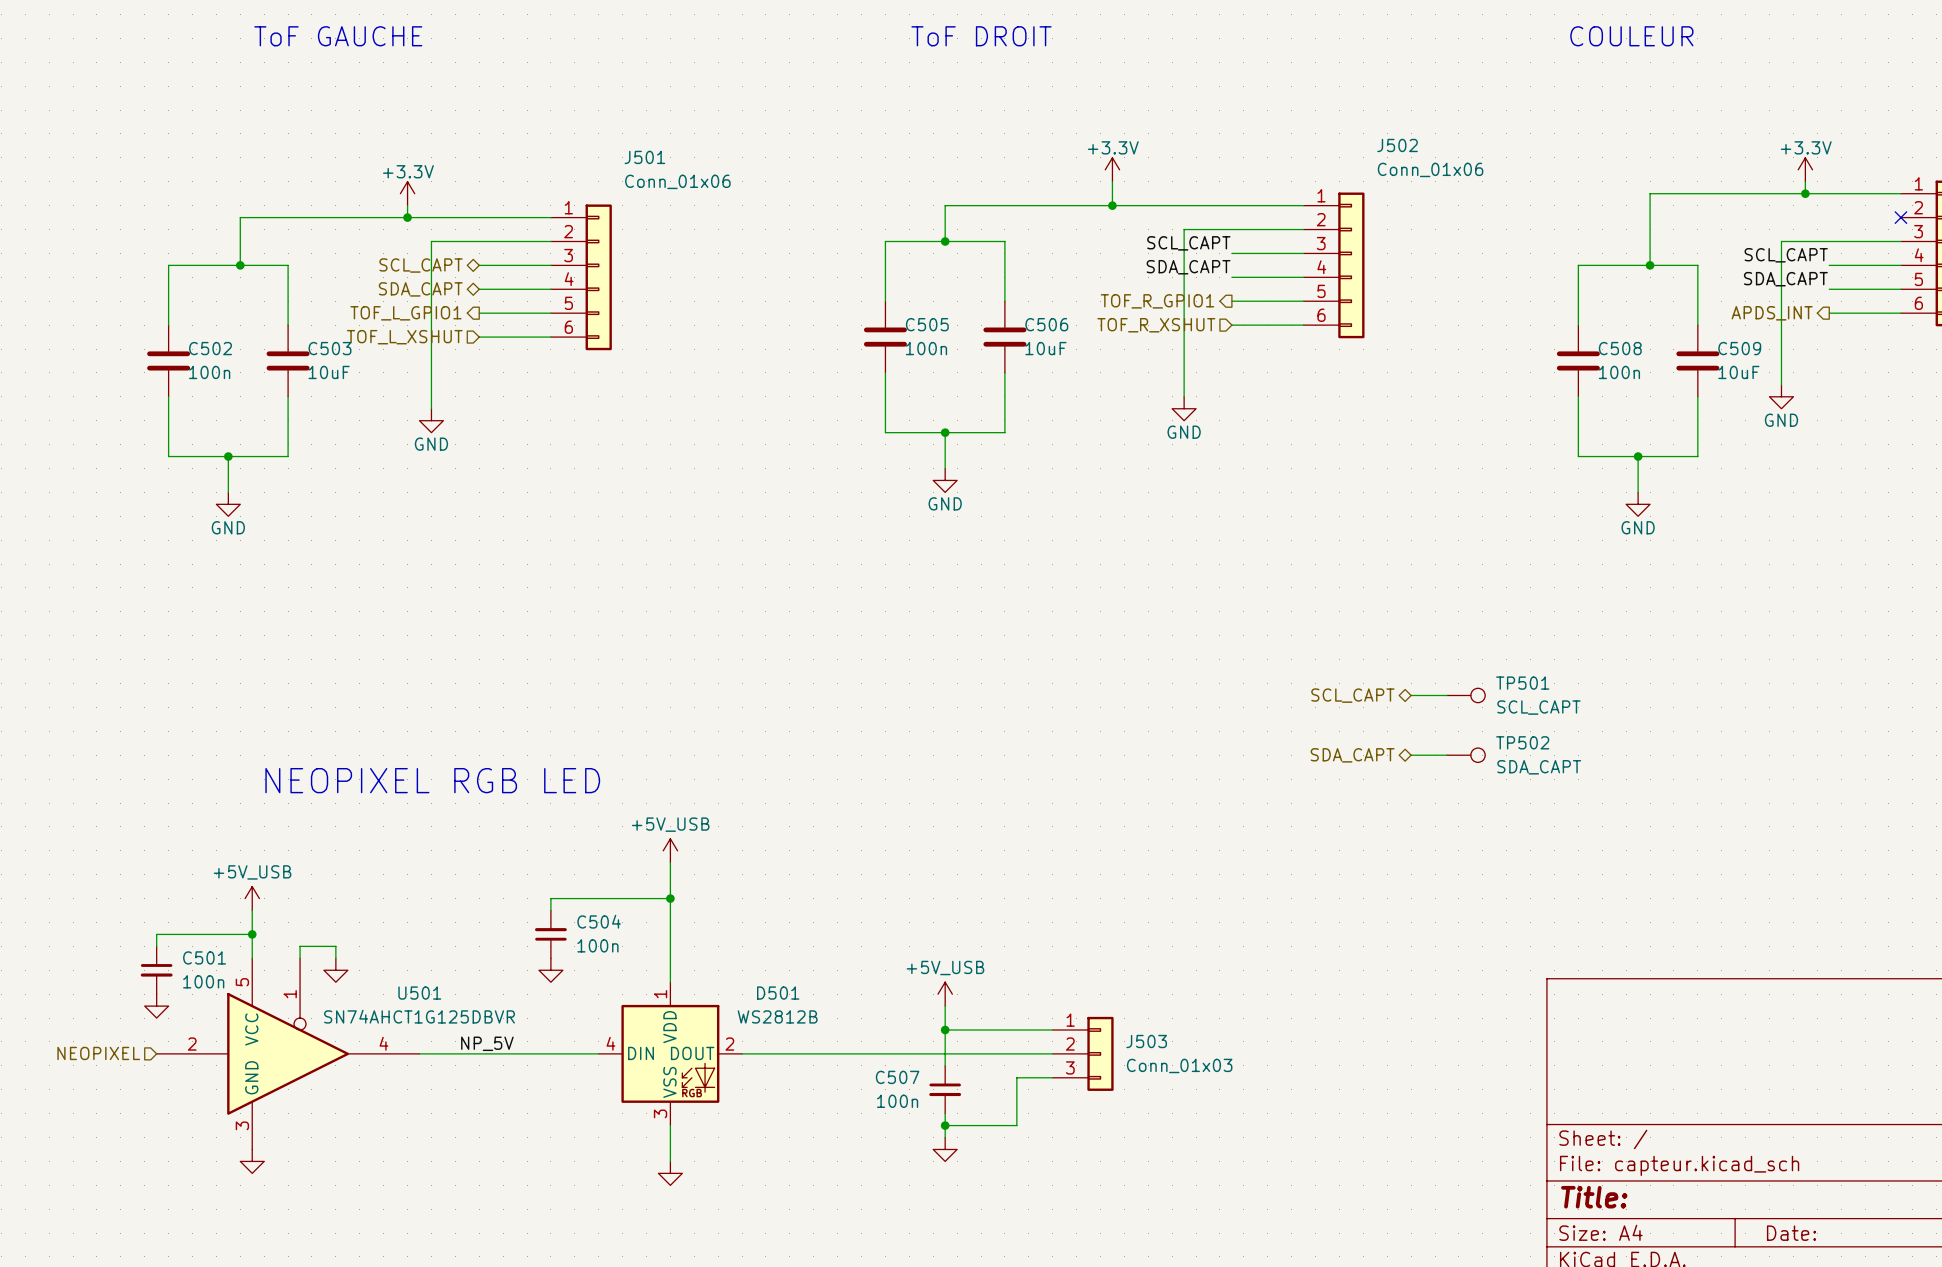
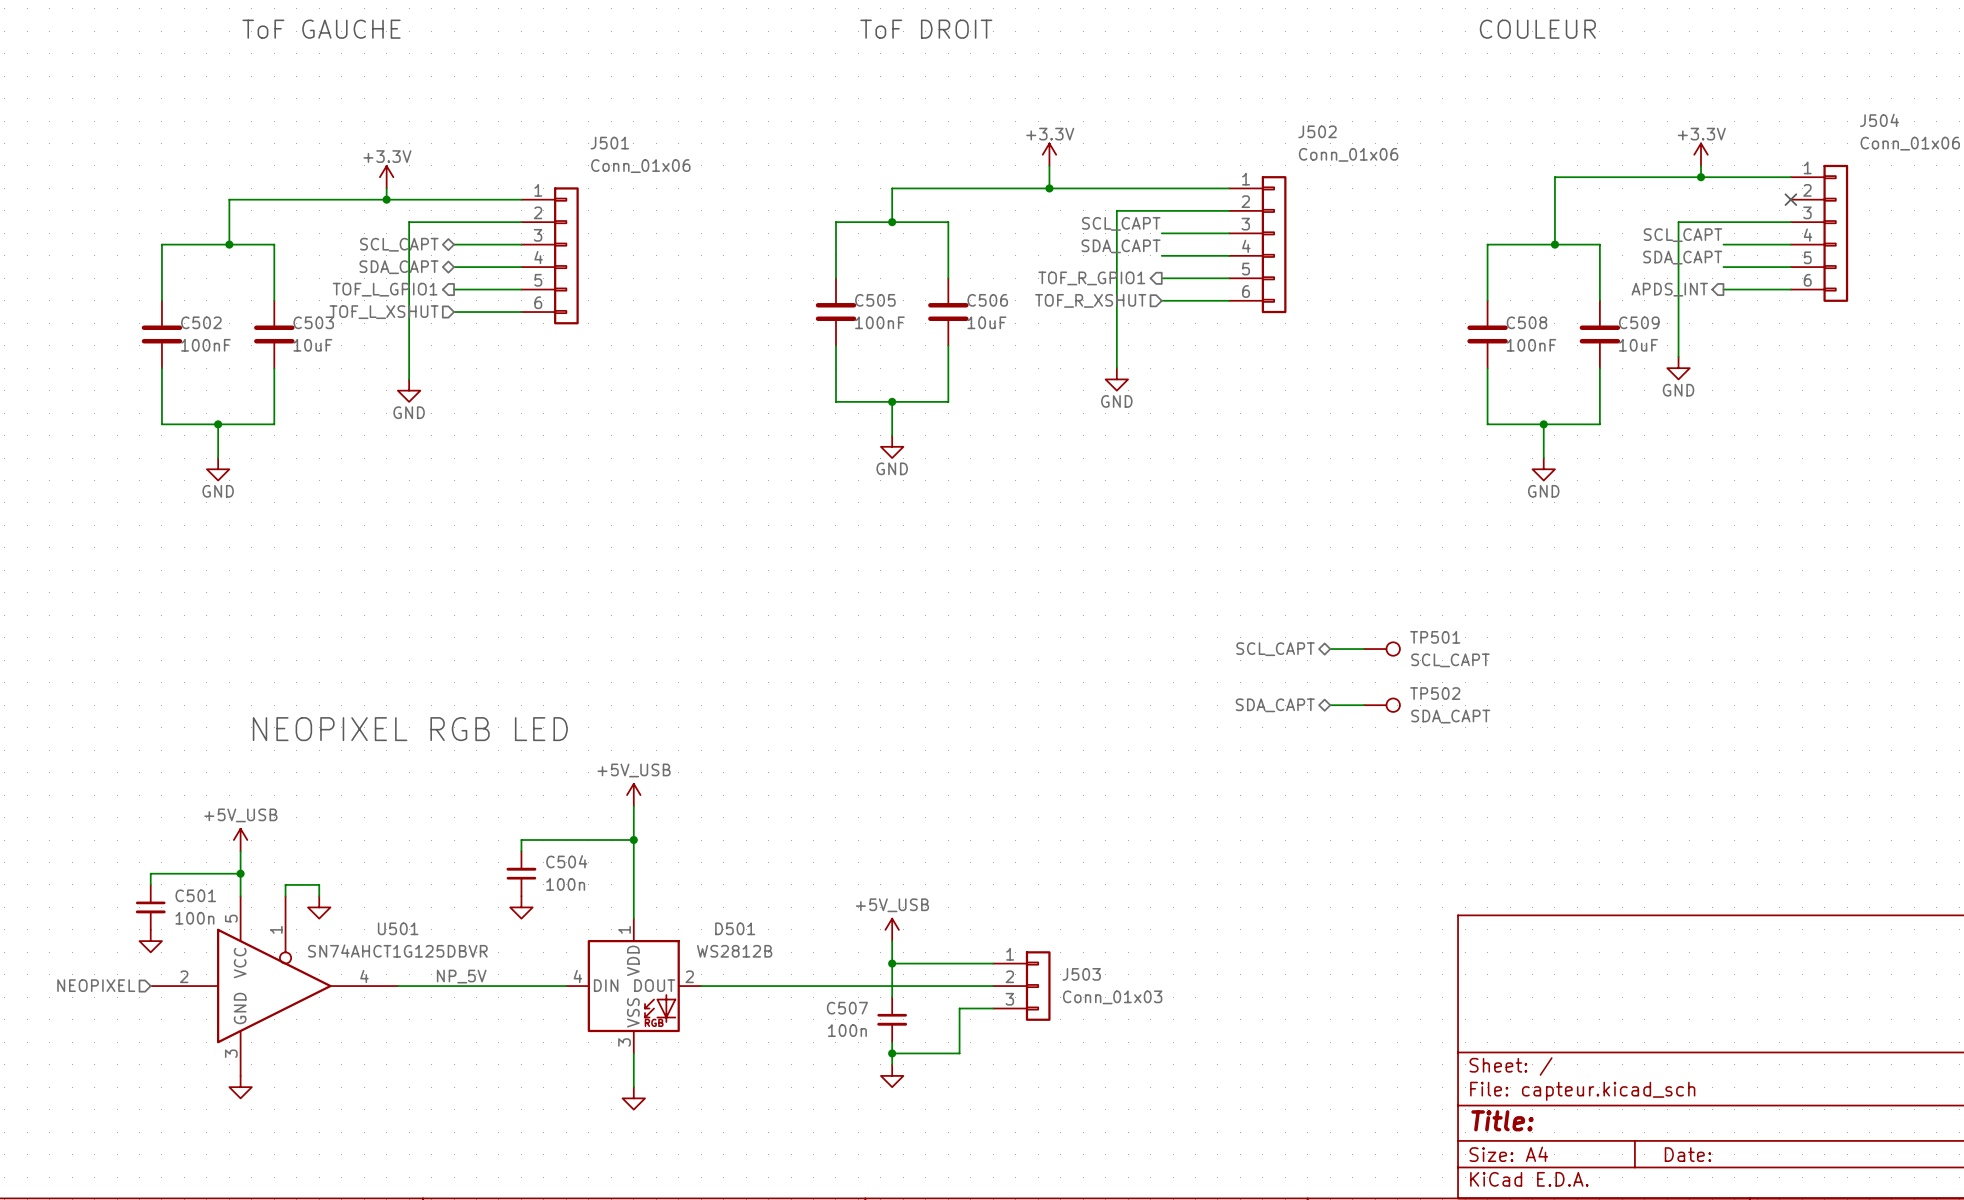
C505 value: 100n (926, 348) -> 100nF (879, 322)
C502 value: 100n (209, 372) -> 100nF (205, 345)
C508 value: 100n (1619, 372) -> 100nF (1531, 345)

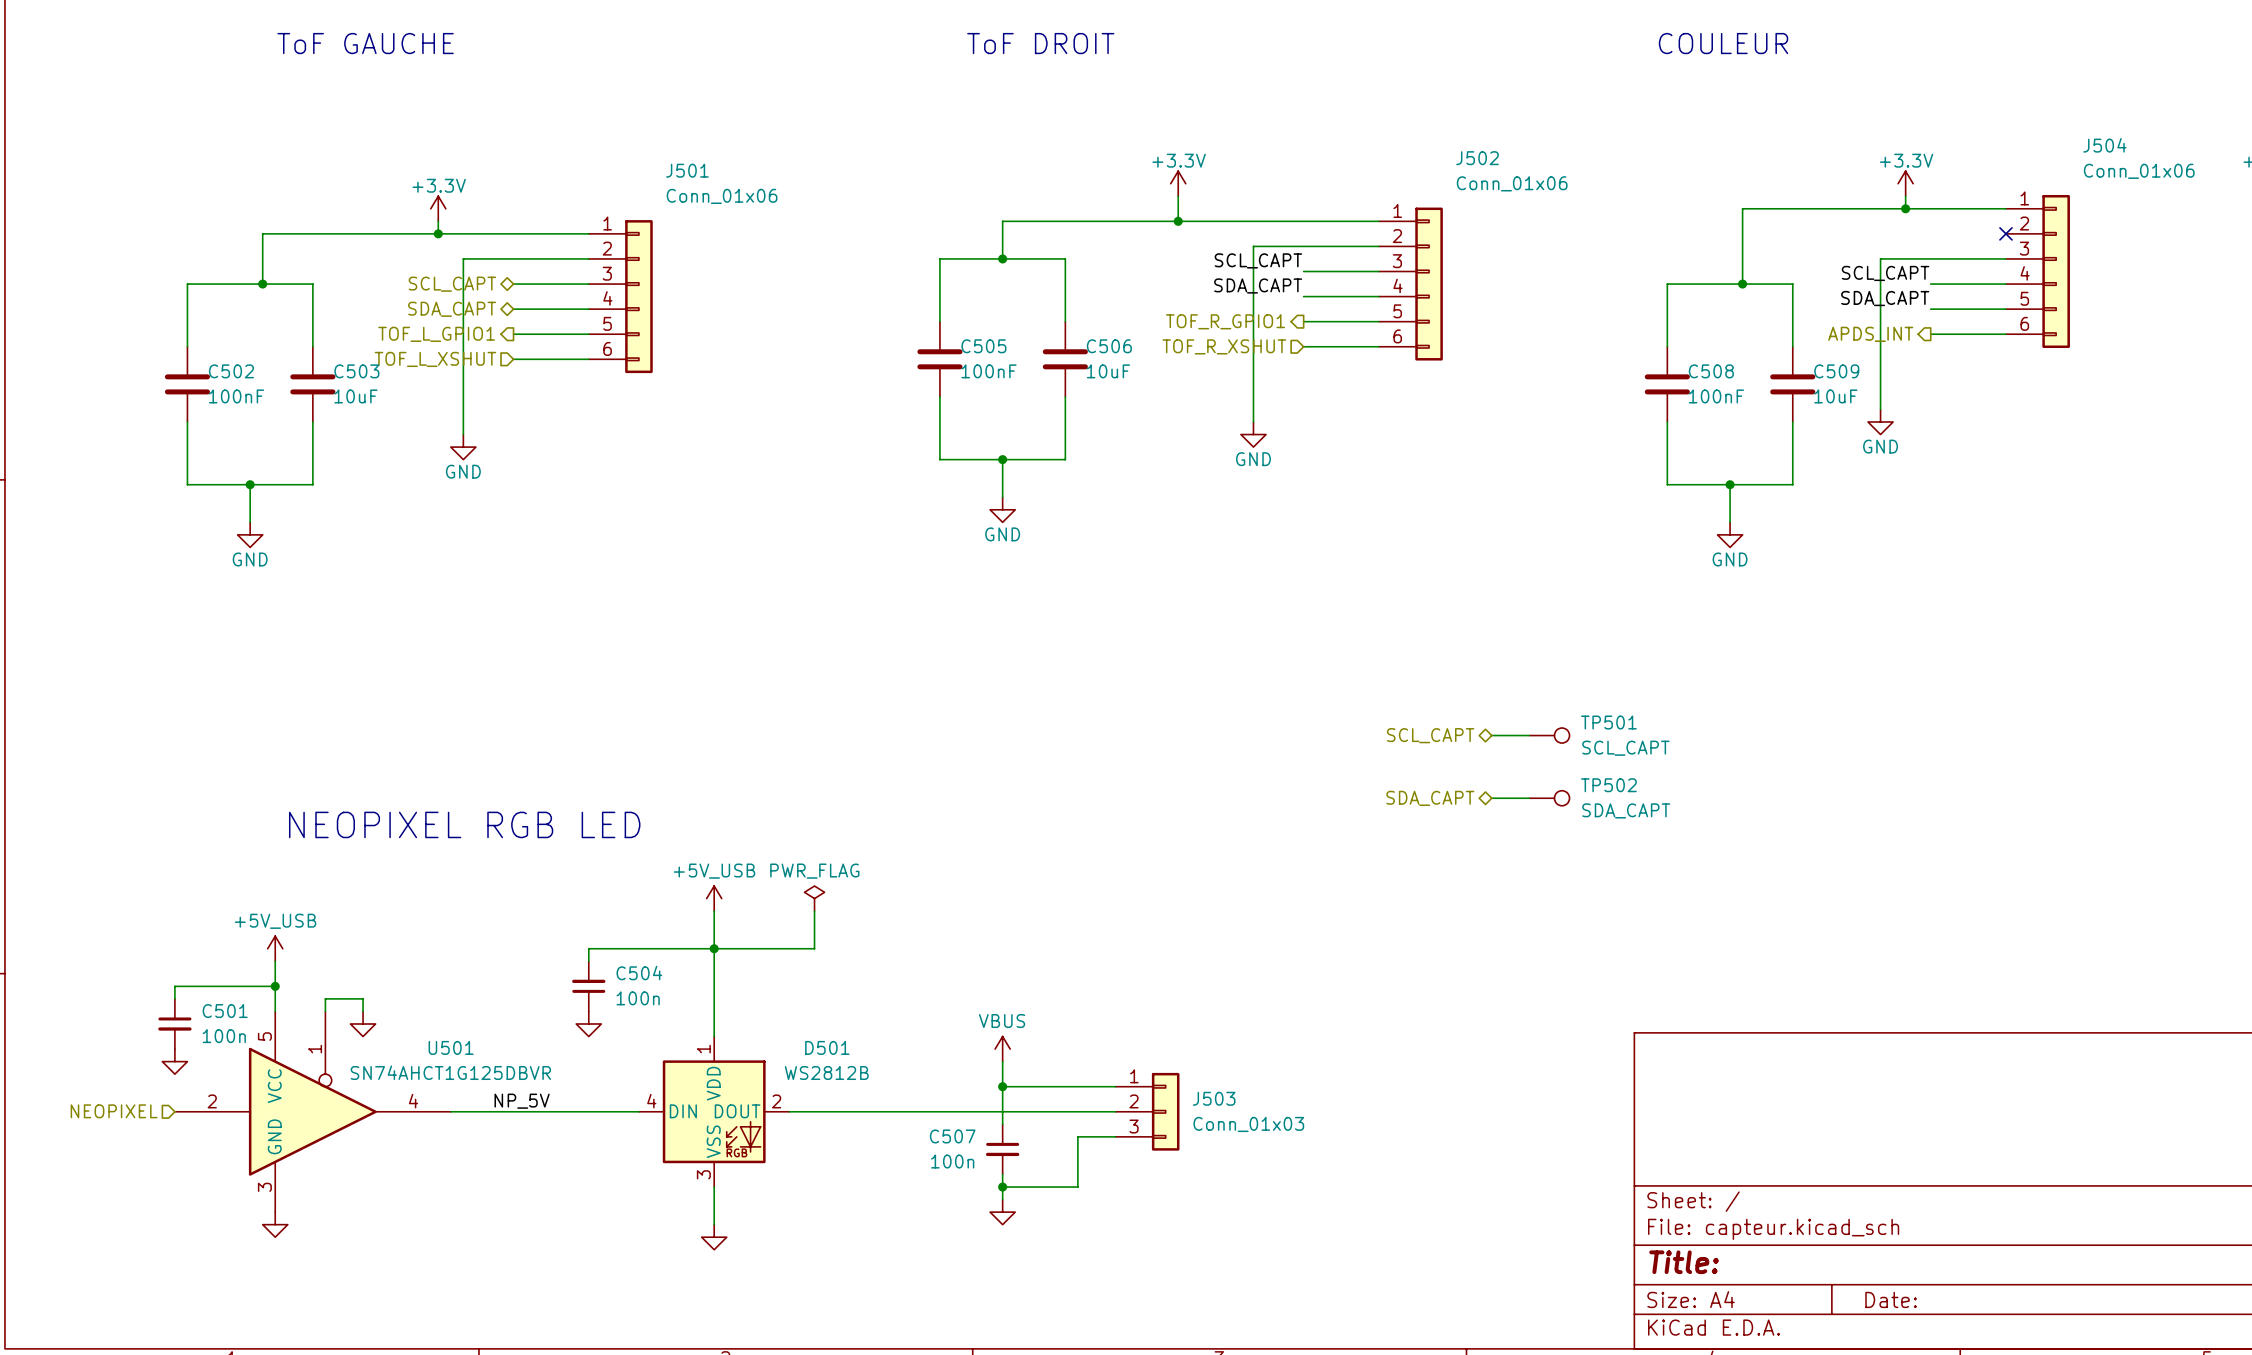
power symbol: none -> PWR_FLAG (814, 898)
wire: none -> (814, 911) (814, 948) (714, 948)
power symbol: +5V_USB (892, 929) -> VBUS (1002, 1049)

